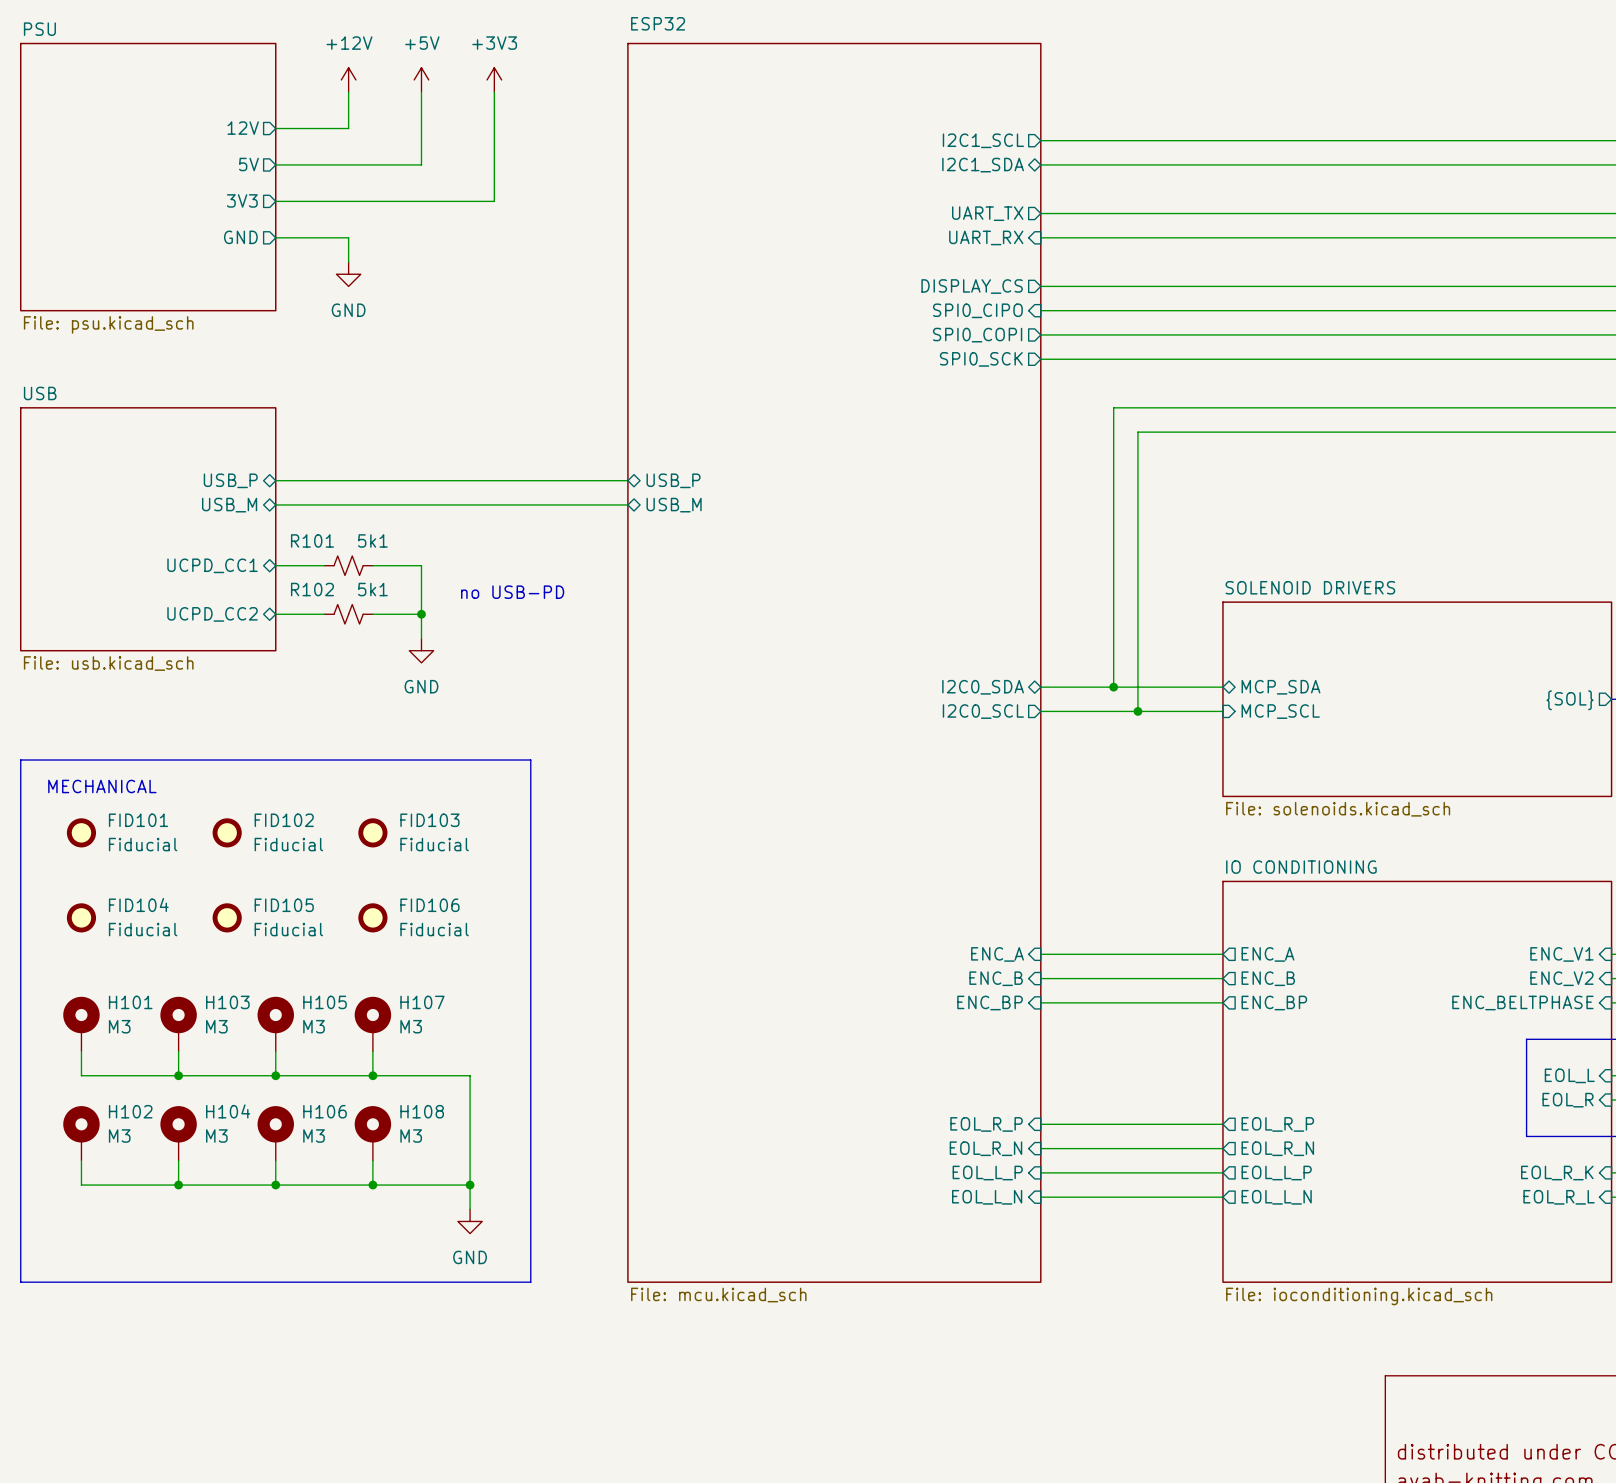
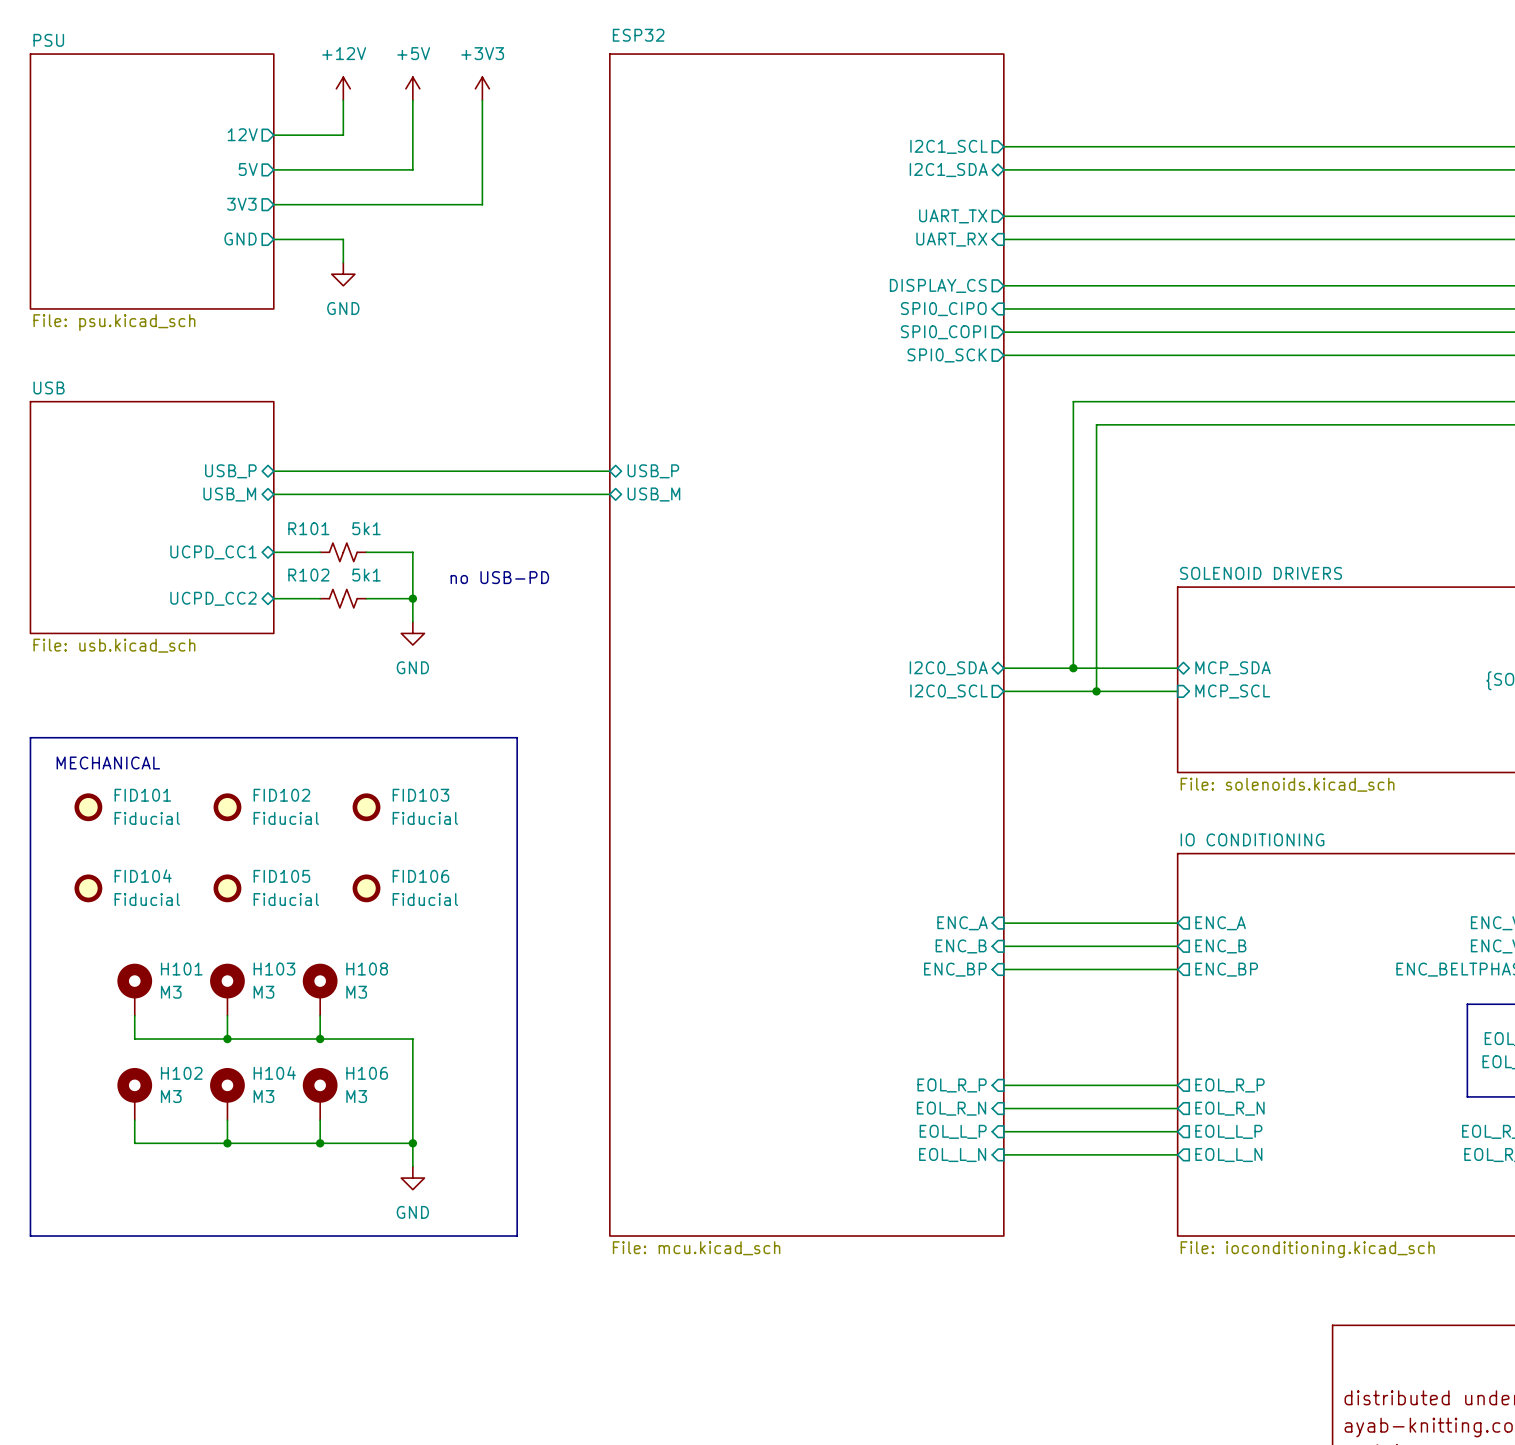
H101 position: (81, 1024) -> (134, 989)
H103 position: (178, 1024) -> (227, 989)
H105: M3 (275, 1024) -> none
H107: M3 (372, 1024) -> none
wire: (81, 1051) (81, 1075) (130, 1075) -> (134, 1015) (134, 1039)
wire: (178, 1051) (178, 1075) -> none
wire: (275, 1051) (275, 1075) -> (227, 1015) (227, 1039)
wire: (372, 1051) (372, 1075) -> (320, 1015) (320, 1039)
junction: (178, 1075) -> none
junction: none -> (227, 1039)
junction: (275, 1075) -> none
junction: none -> (320, 1039)
junction: (372, 1075) -> none
wire: (421, 1075) (470, 1075) (470, 1209) -> (412, 1039) (412, 1166)
H102 position: (81, 1133) -> (134, 1094)
H104 position: (178, 1133) -> (227, 1094)
H106 position: (275, 1133) -> (320, 1094)
H108 position: (372, 1133) -> (320, 989)
wire: (81, 1160) (81, 1185) (130, 1185) -> (134, 1120) (134, 1143)
wire: (178, 1160) (178, 1185) -> none
wire: (275, 1160) (275, 1185) -> (227, 1120) (227, 1143)
wire: (372, 1160) (372, 1185) -> (320, 1120) (320, 1143)
junction: (178, 1185) -> none
junction: none -> (227, 1143)
junction: (275, 1185) -> none
junction: none -> (320, 1143)
junction: (372, 1185) -> none
wire: (421, 1185) (470, 1185) -> none
junction: none -> (412, 1143)
junction: (470, 1185) -> none
power symbol position: GND (470, 1221) -> GND (412, 1178)

